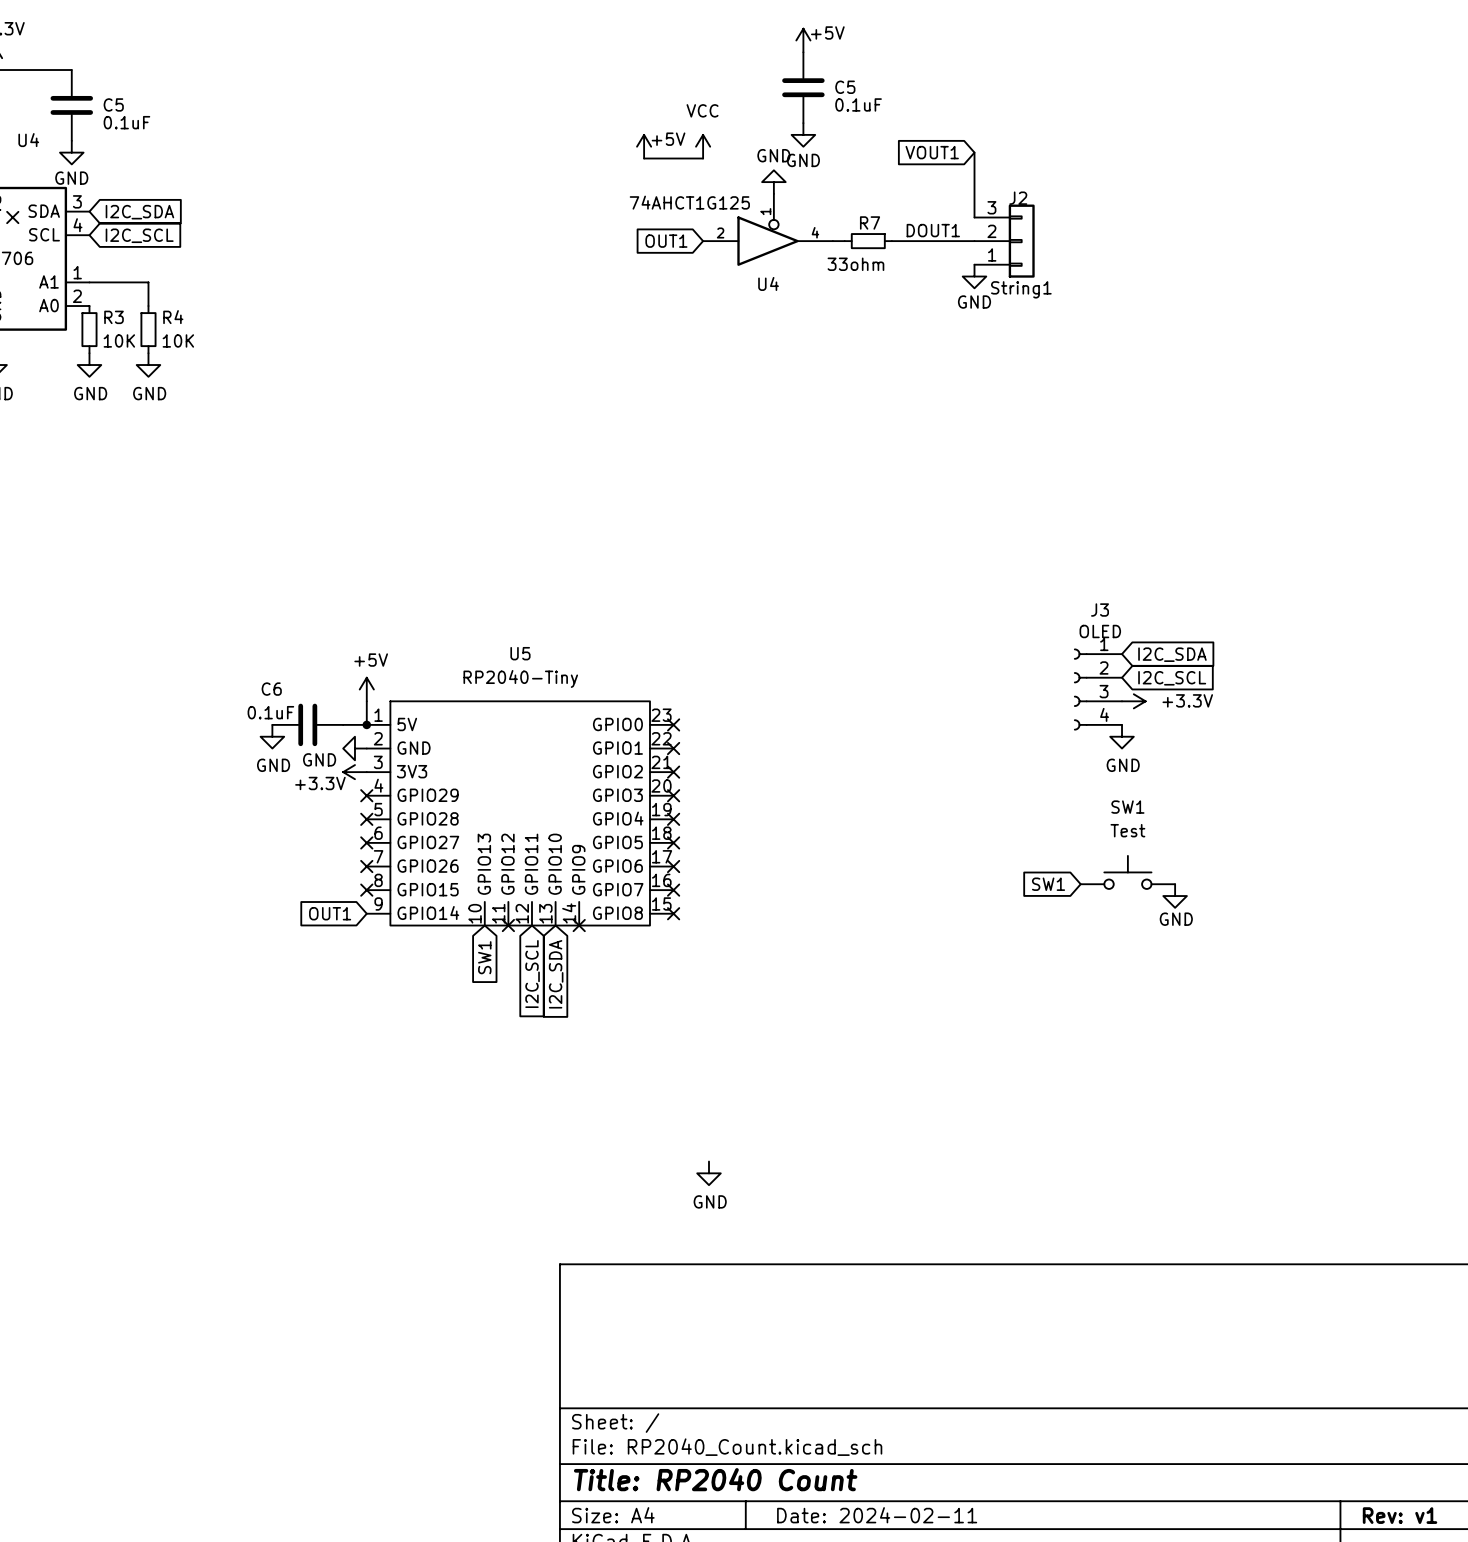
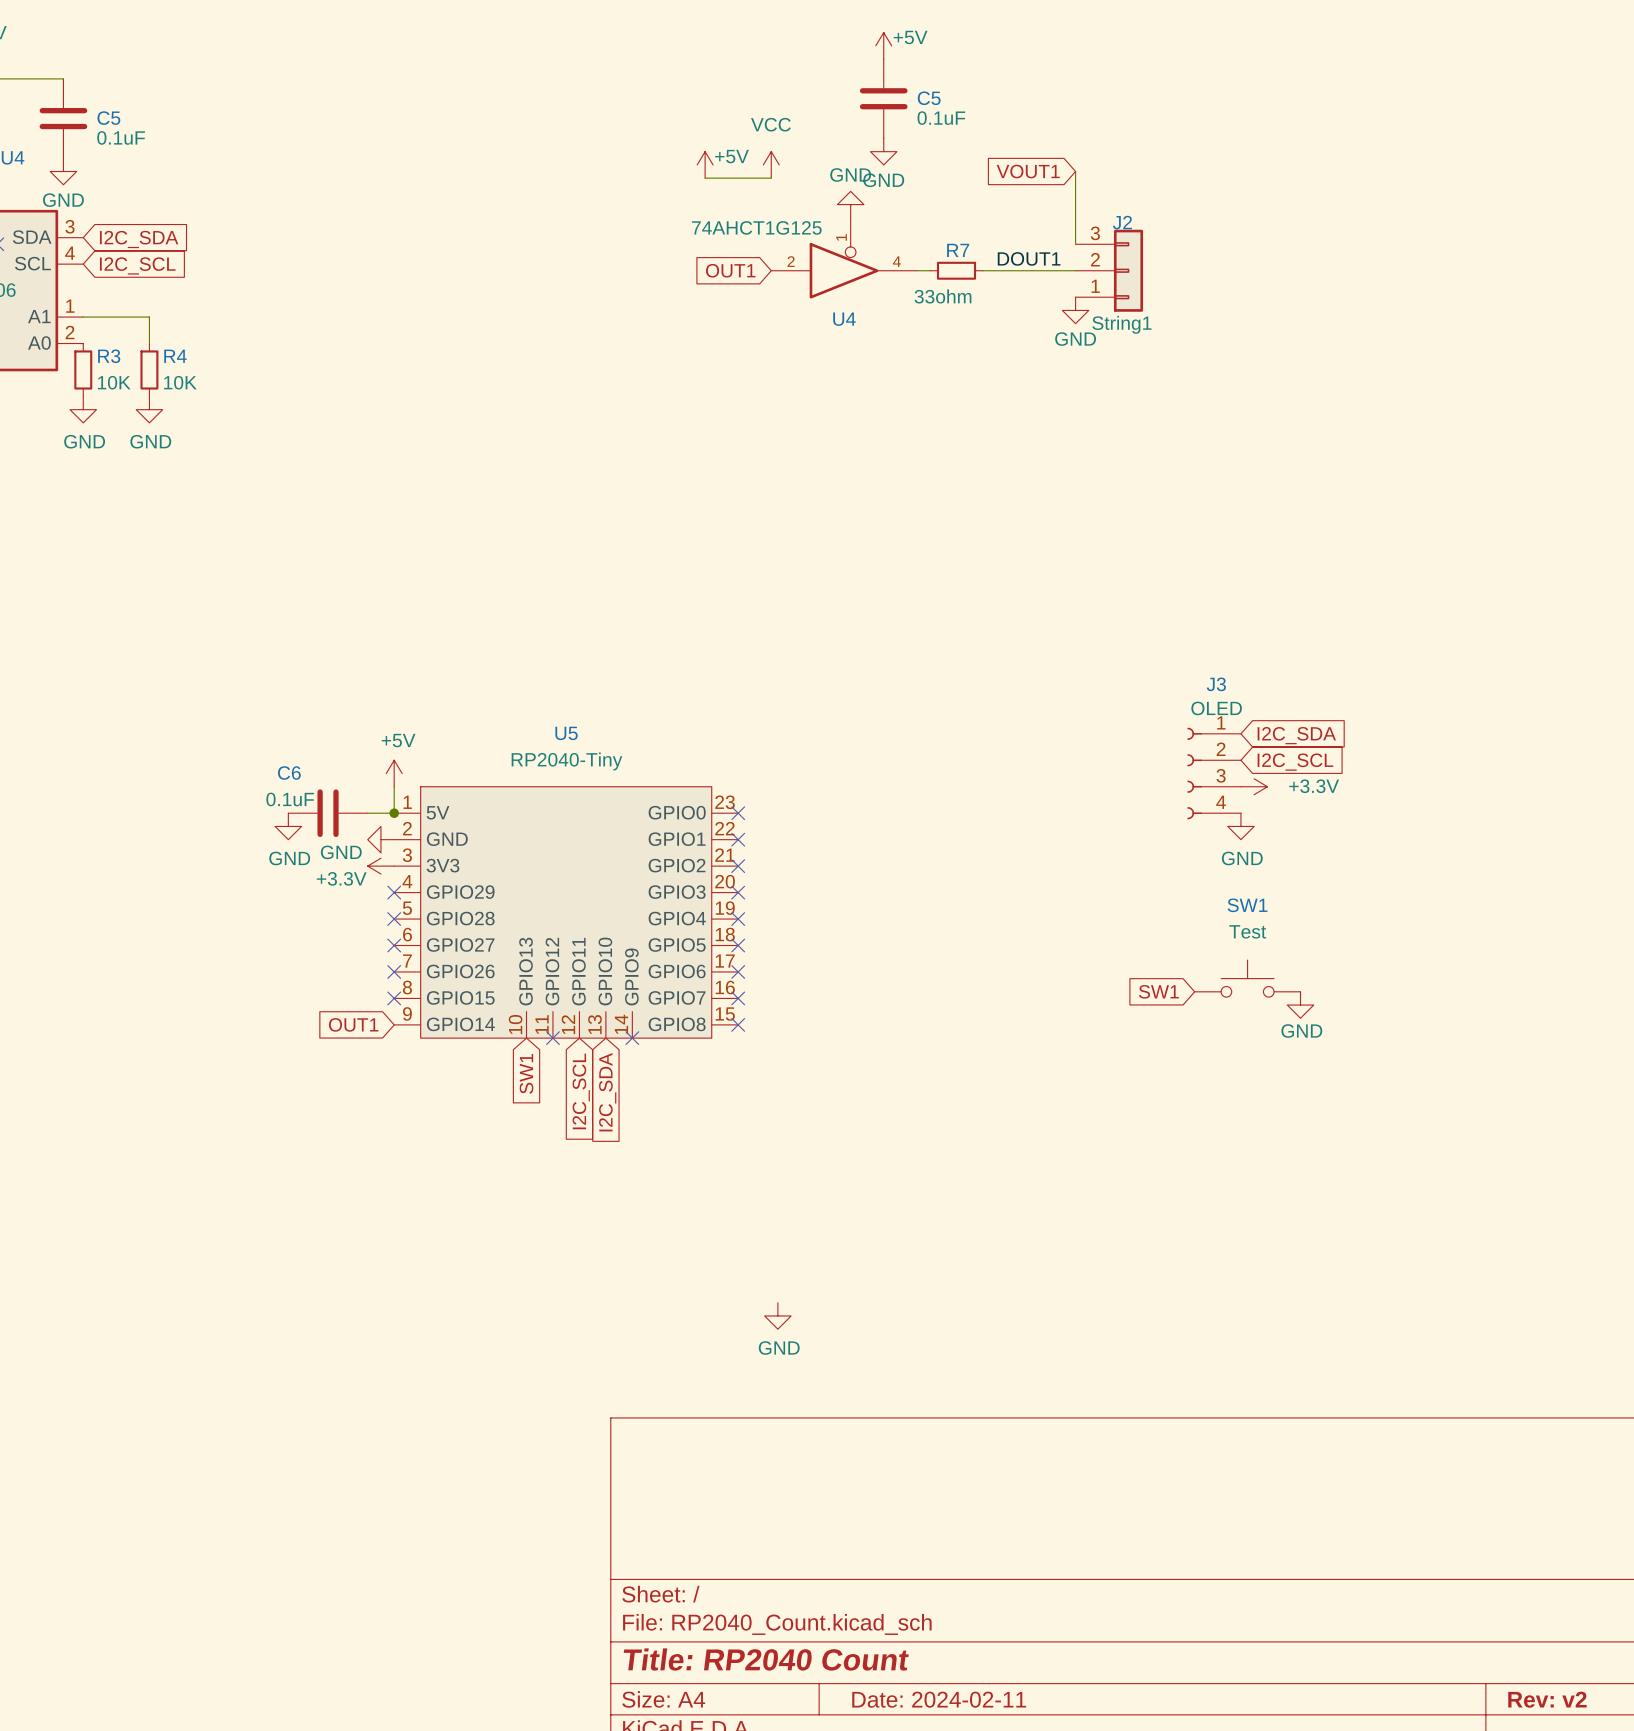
title block: Rev: v1 (1400, 1515) -> Rev: v2 (1547, 1699)

